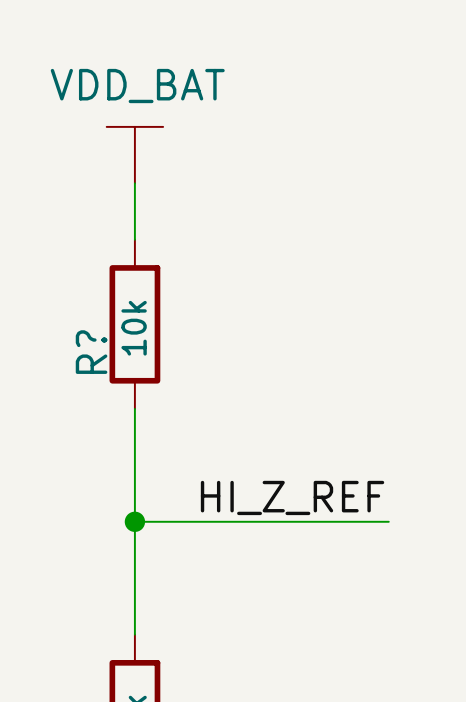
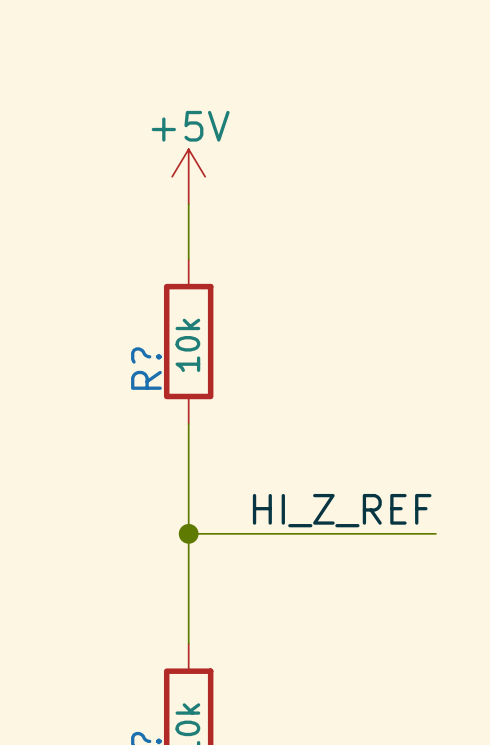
power symbol: VDD_BAT (134, 155) -> +5V (188, 176)

